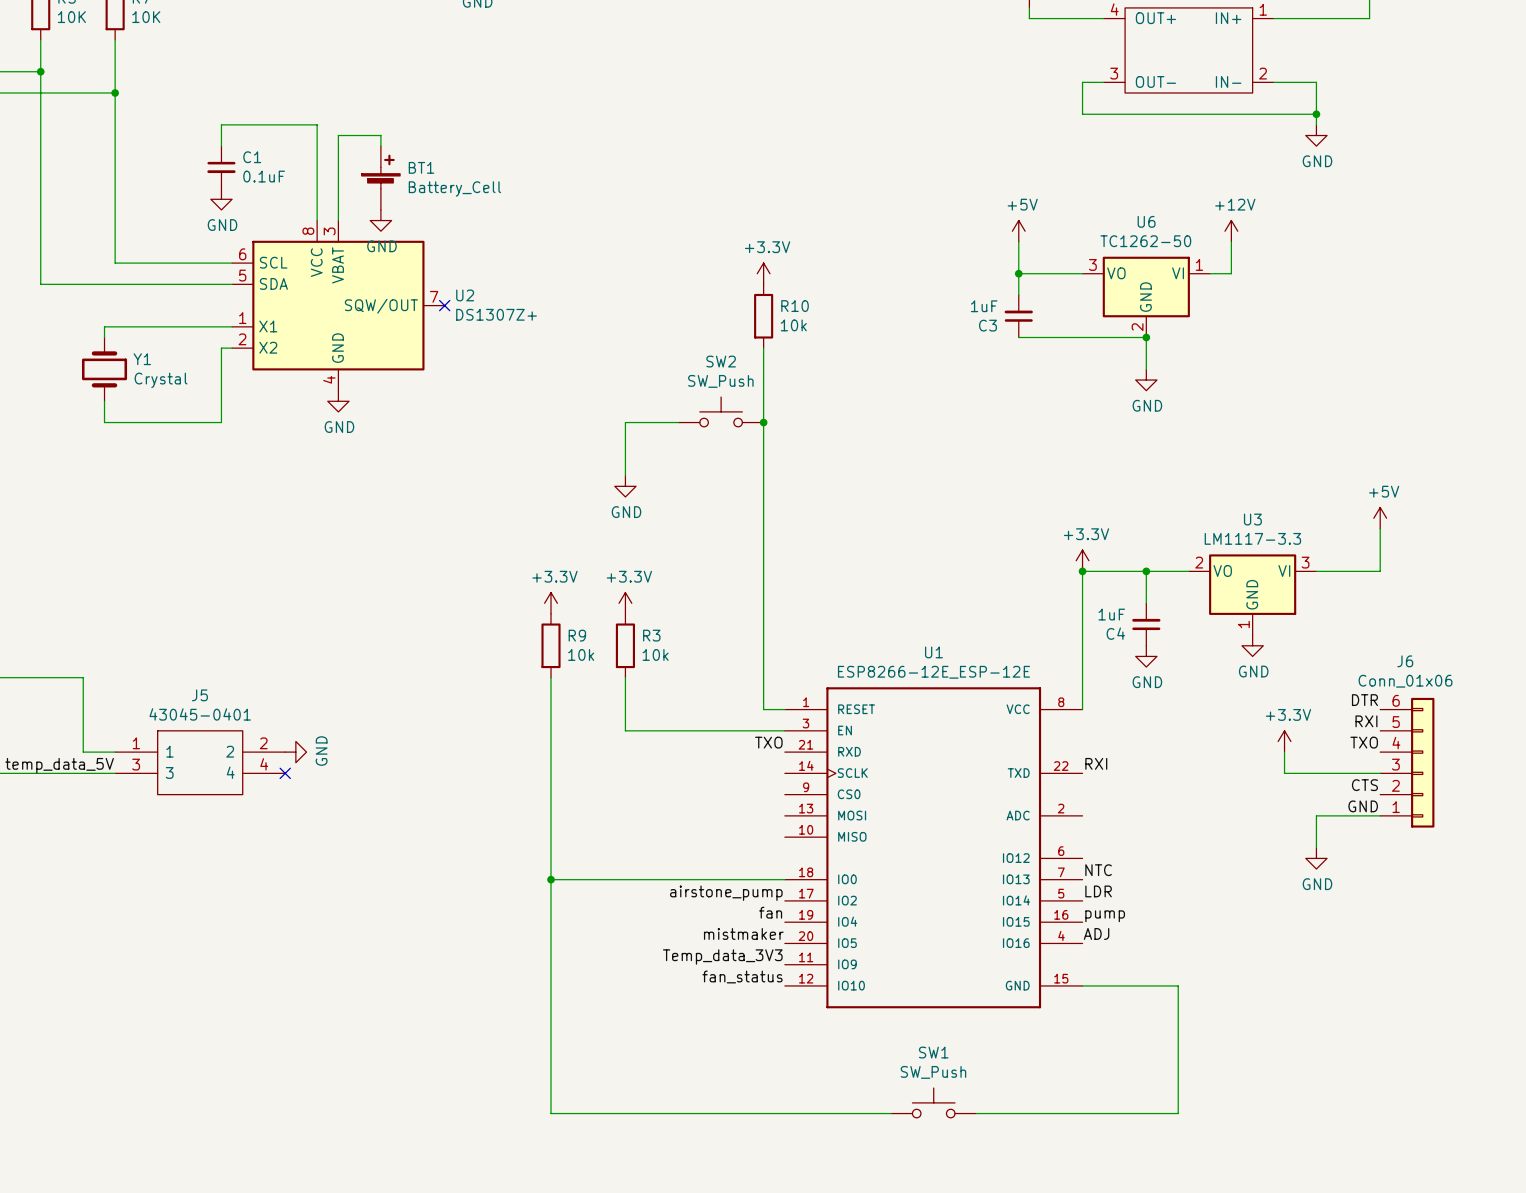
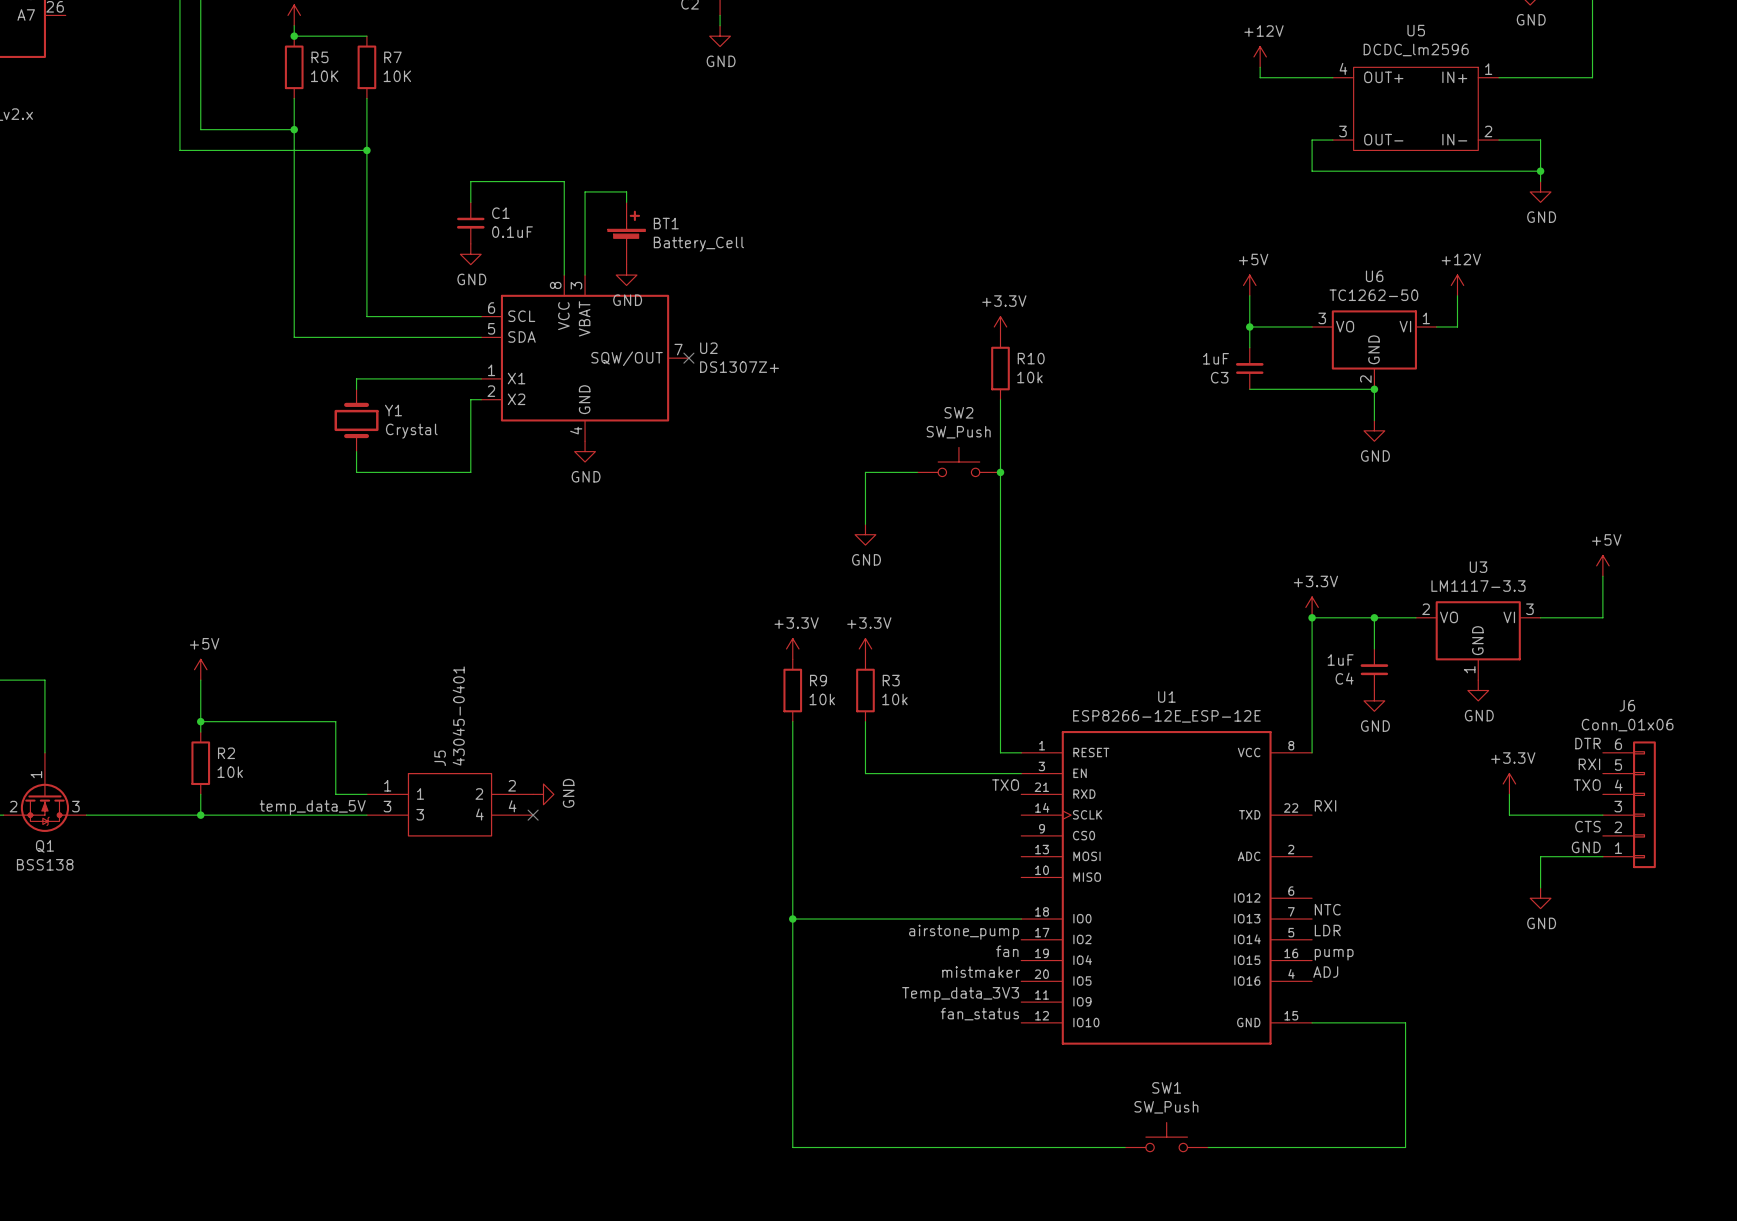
J5 name rotation: 0° (199, 695) -> 90° counterclockwise (440, 758)
J5 value rotation: 0° (200, 714) -> 90° counterclockwise (458, 716)

